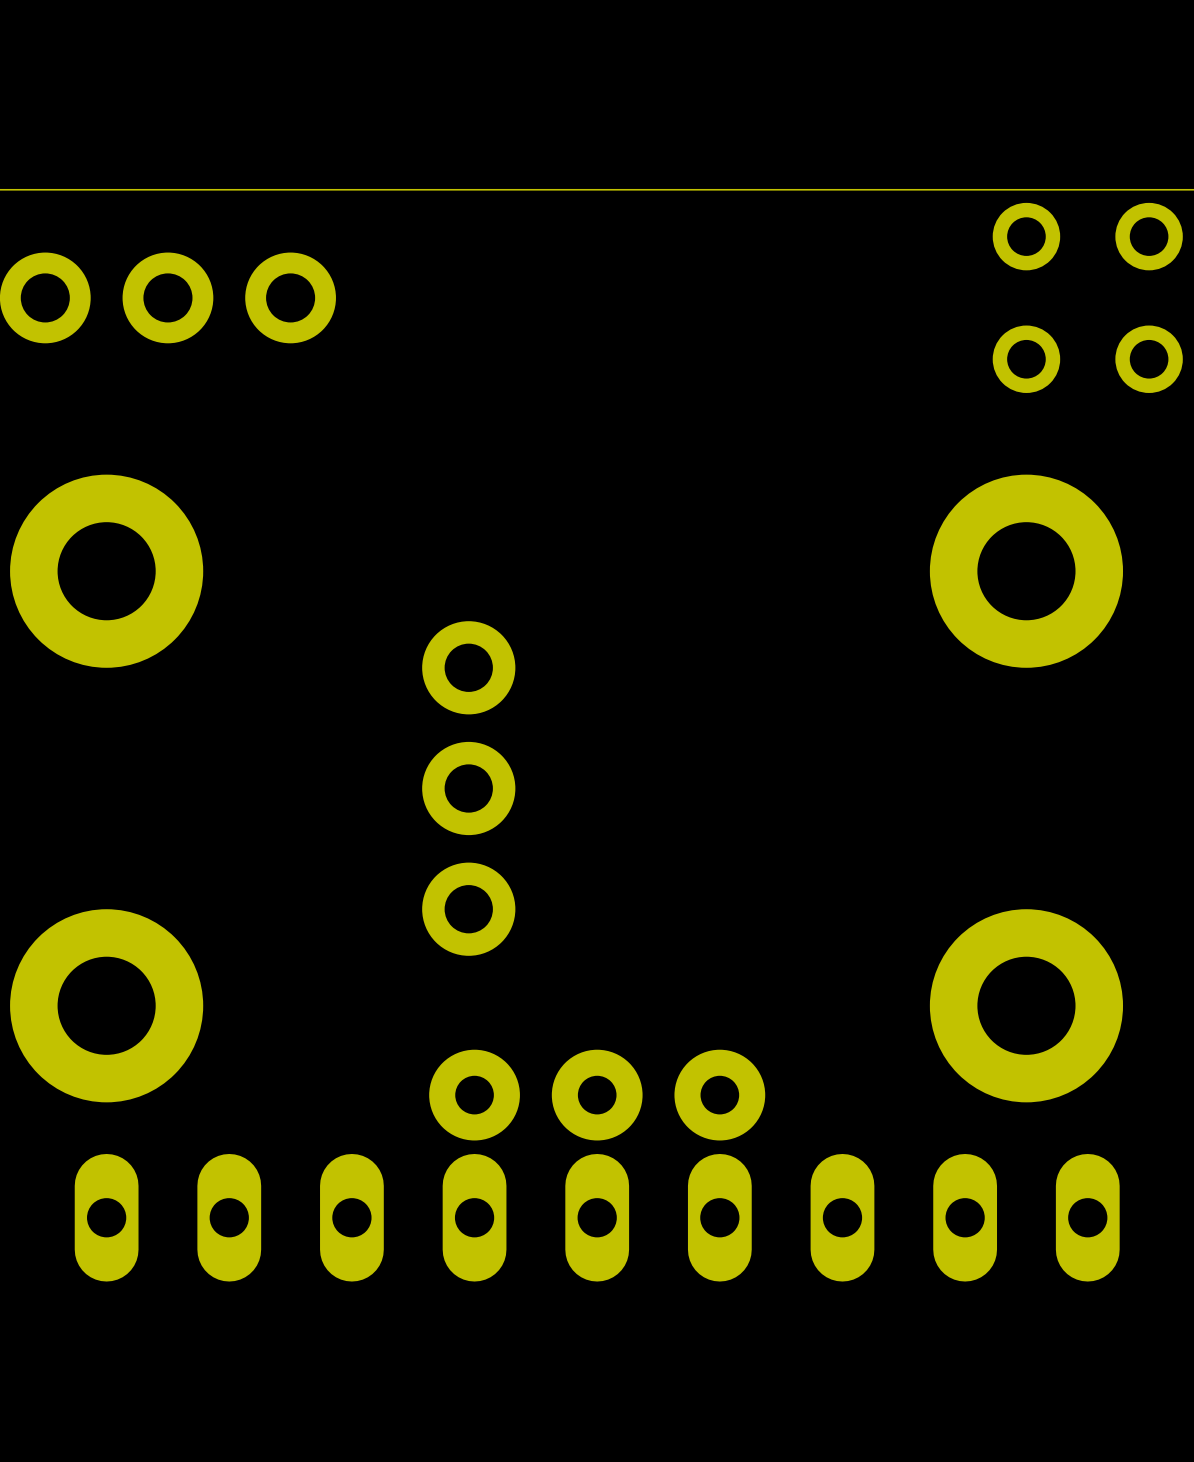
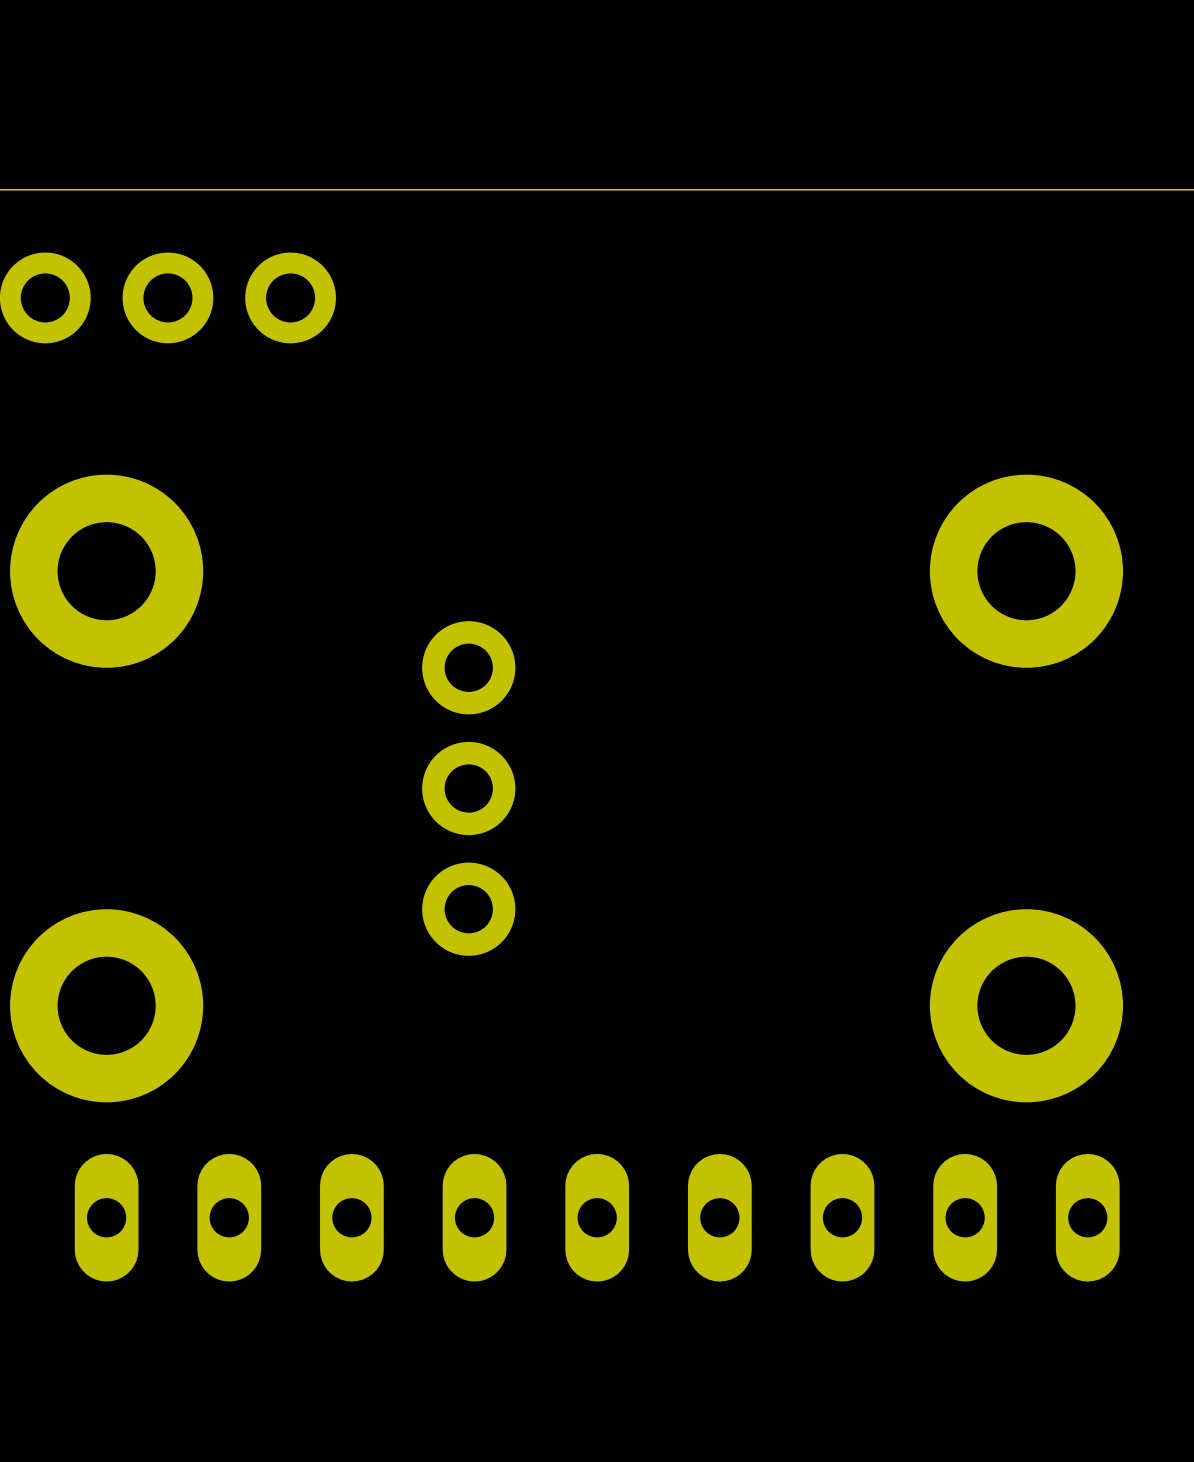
part: (1087, 236) -> none
part: (1087, 359) -> none
part: (597, 1095) -> none

